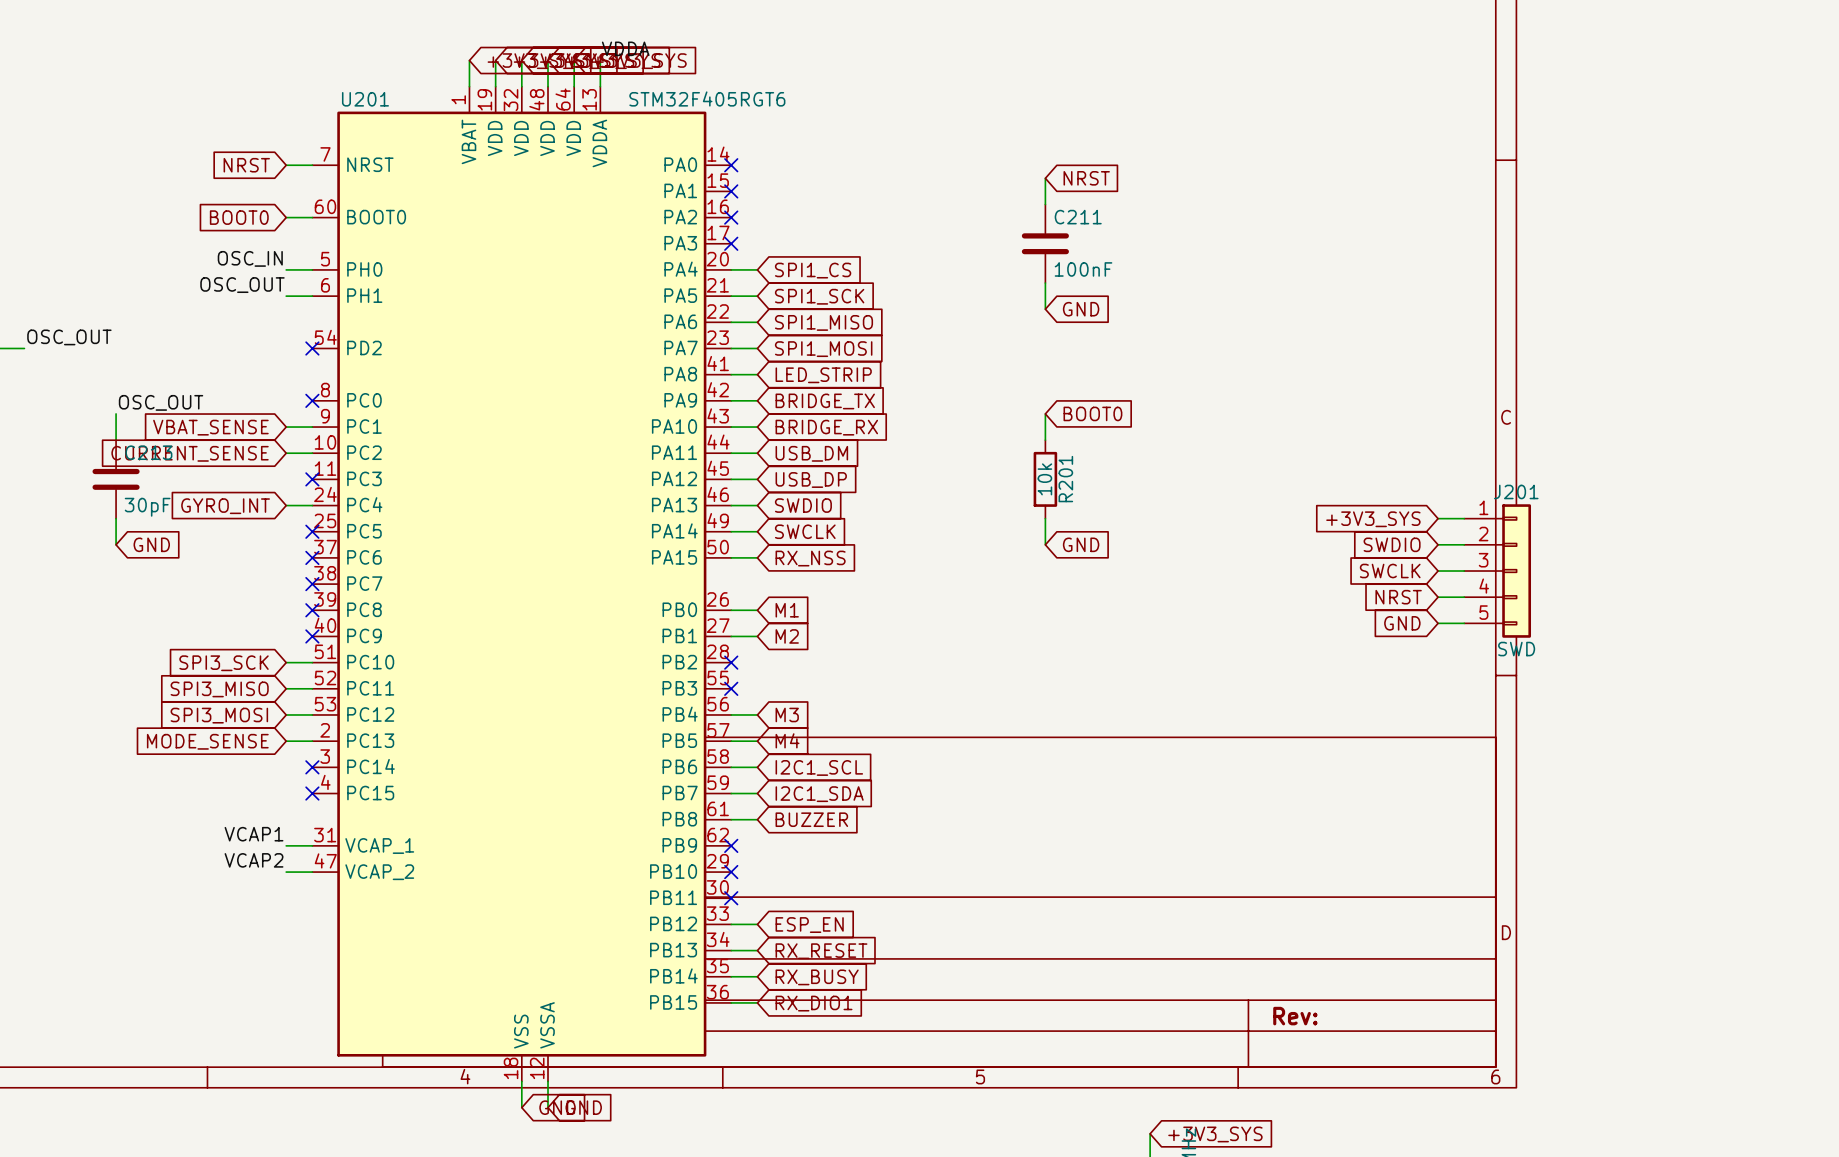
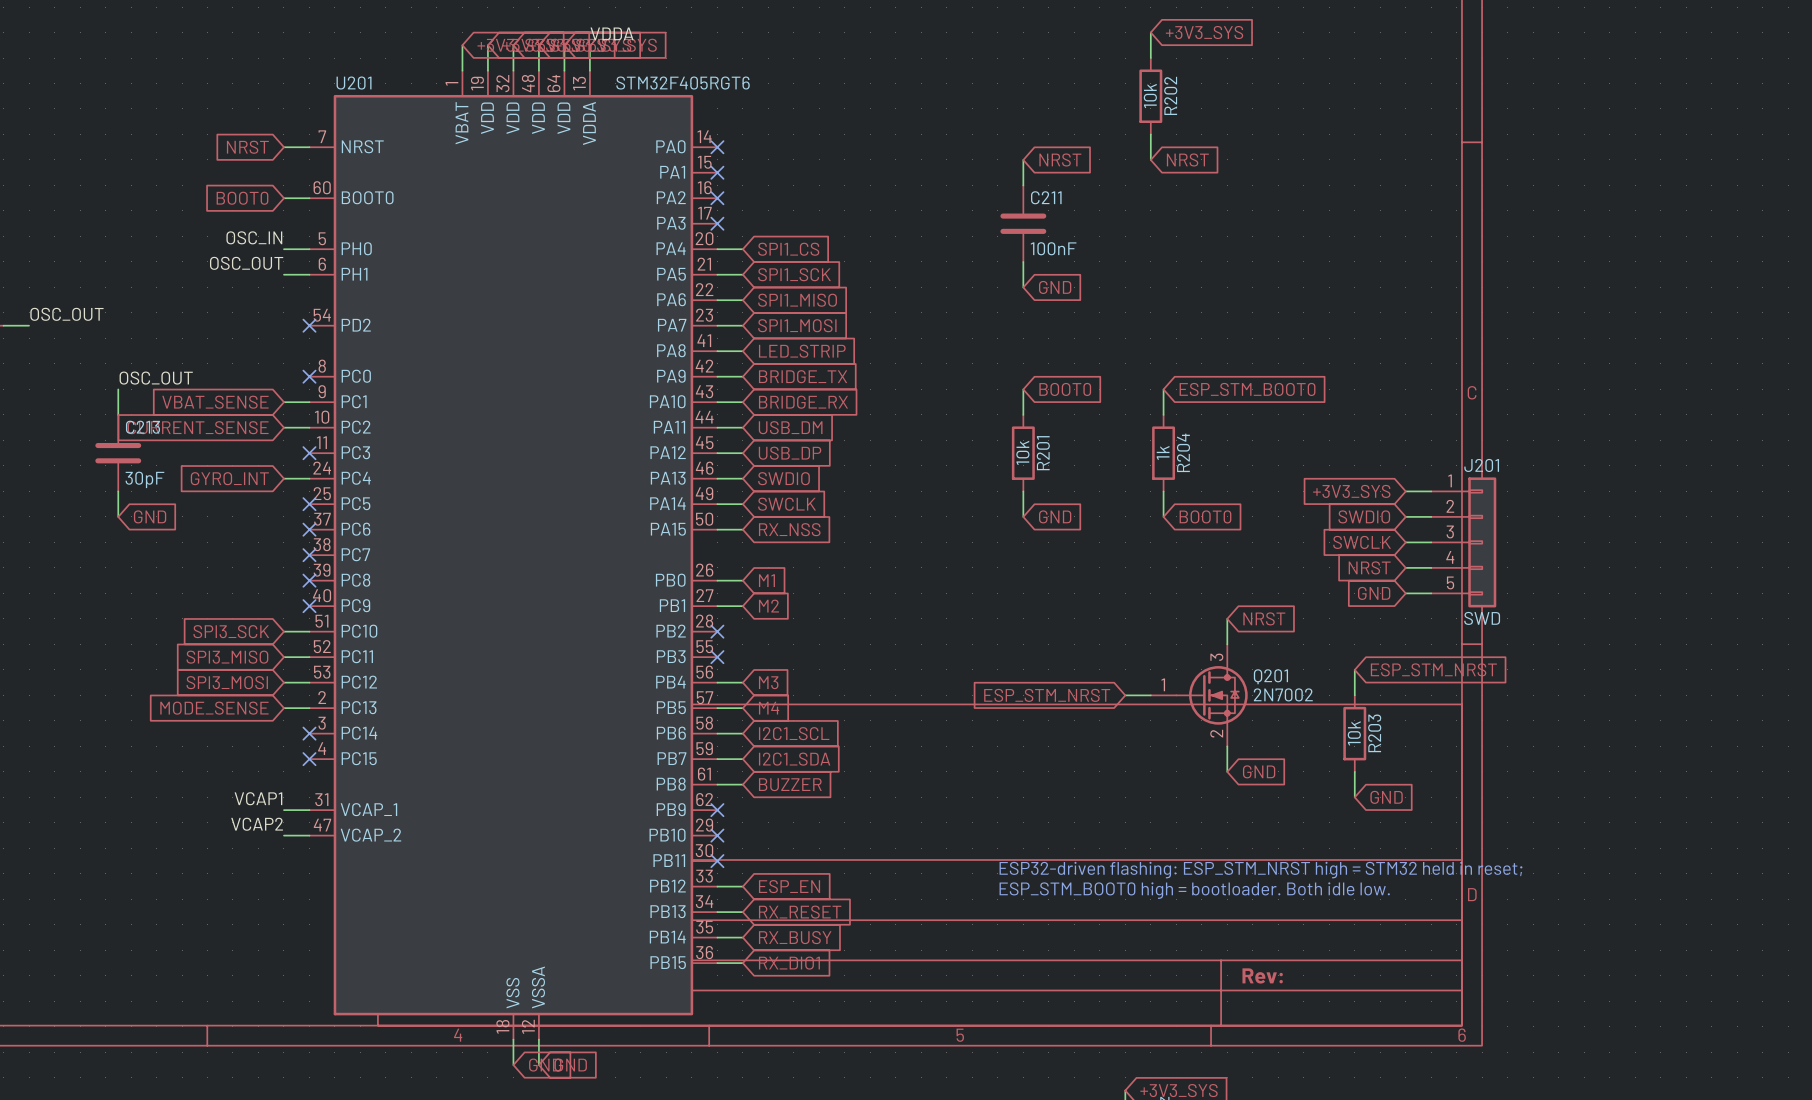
wire: none -> (1150, 32) (1150, 58)
global label: none -> +3V3_SYS (1204, 32)
R202: none -> 10k (1150, 96)
wire: none -> (1150, 134) (1150, 159)
global label: none -> NRST (1187, 159)
wire: none -> (1163, 389) (1163, 414)
global label: none -> ESP_STM_BOOT0 (1247, 389)
R204: none -> 1k (1163, 453)
wire: none -> (1163, 491) (1163, 516)
global label: none -> BOOT0 (1205, 516)
wire: none -> (1227, 618) (1227, 644)
global label: none -> NRST (1264, 618)
wire: none -> (1354, 669) (1354, 695)
global label: none -> ESP_STM_NRST (1433, 669)
global label: none -> ESP_STM_NRST (1047, 695)
wire: none -> (1125, 695) (1150, 695)
Q201: none -> 2N7002 (1199, 695)
R203: none -> 10k (1354, 733)
wire: none -> (1227, 746) (1227, 771)
global label: none -> GND (1259, 771)
wire: none -> (1354, 771) (1354, 797)
global label: none -> GND (1386, 797)
text: none -> ESP32-driven flashing: ESP_STM_NRST high = STM32 held in reset; (1260, 870)
text: none -> ESP_STM_BOOT0 high = bootloader. Both idle low. (1194, 890)

